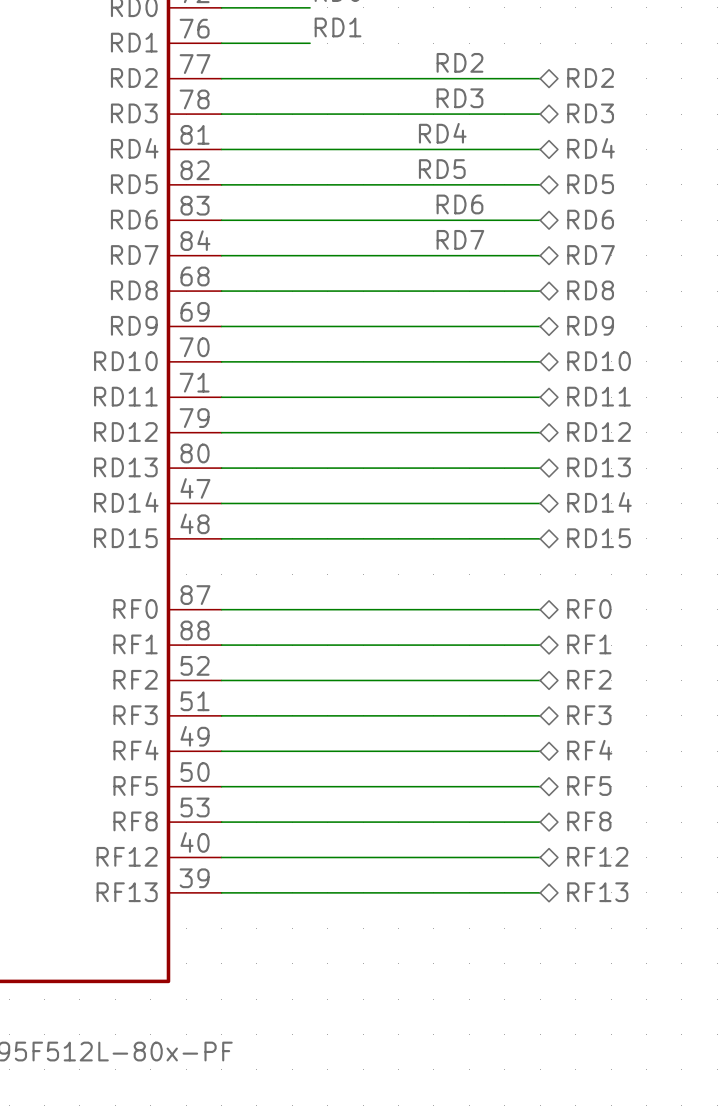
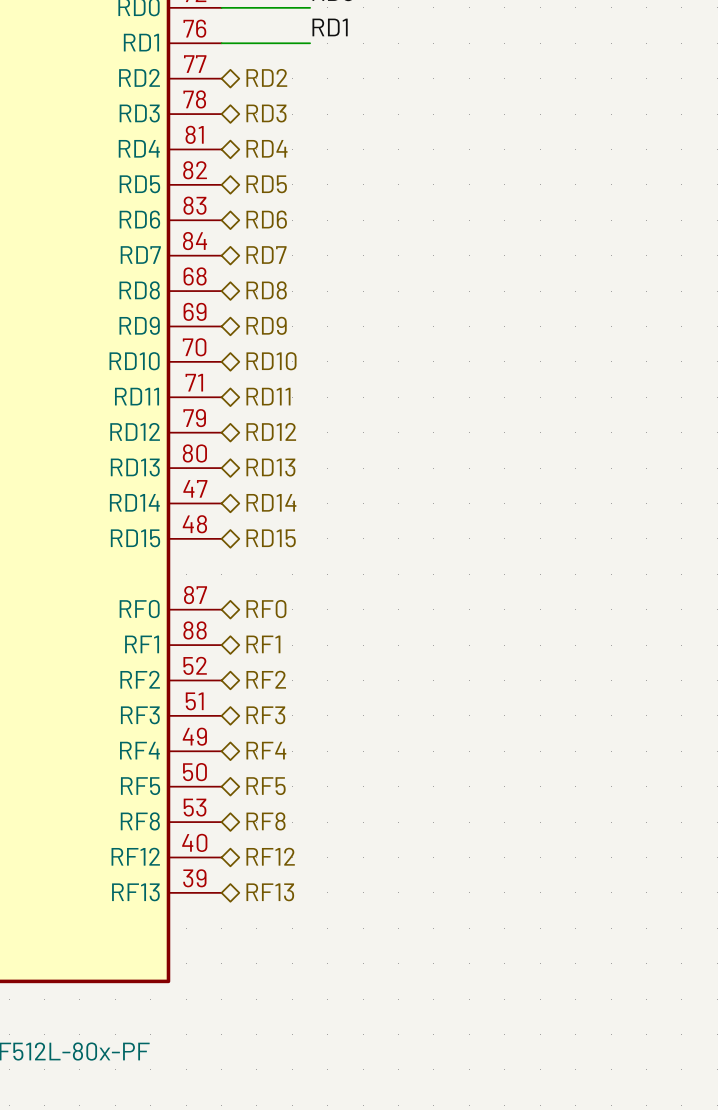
label: RD2 (459, 62) -> none
wire: (221, 78) (540, 78) -> none
hierarchical label position: RD2 (590, 78) -> RD2 (266, 77)
label: RD3 (459, 98) -> none
hierarchical label position: RD3 (590, 113) -> RD3 (266, 113)
wire: (221, 114) (540, 114) -> none
label: RD4 (442, 133) -> none
hierarchical label position: RD4 (591, 148) -> RD4 (267, 148)
wire: (221, 149) (540, 149) -> none
label: RD5 (442, 169) -> none
wire: (221, 184) (540, 184) -> none
hierarchical label position: RD5 (590, 184) -> RD5 (266, 184)
label: RD6 (459, 204) -> none
hierarchical label position: RD6 (590, 219) -> RD6 (266, 219)
wire: (221, 220) (540, 220) -> none
label: RD7 (460, 239) -> none
wire: (221, 255) (540, 255) -> none
hierarchical label position: RD7 (591, 255) -> RD7 (266, 255)
hierarchical label position: RD8 (590, 290) -> RD8 (266, 290)
wire: (221, 291) (540, 291) -> none
hierarchical label position: RD9 (590, 325) -> RD9 (266, 325)
wire: (221, 326) (540, 326) -> none
wire: (221, 361) (540, 361) -> none
hierarchical label position: RD10 (599, 361) -> RD10 (271, 361)
hierarchical label position: RD11 (599, 396) -> RD11 (268, 396)
wire: (221, 397) (540, 397) -> none
wire: (221, 432) (540, 432) -> none
hierarchical label position: RD12 (599, 432) -> RD12 (271, 431)
hierarchical label position: RD13 (599, 467) -> RD13 (270, 467)
wire: (221, 468) (540, 468) -> none
hierarchical label position: RD14 (599, 502) -> RD14 (271, 502)
wire: (221, 503) (540, 503) -> none
wire: (221, 538) (540, 538) -> none
hierarchical label position: RD15 (599, 538) -> RD15 (271, 538)
wire: (221, 609) (540, 609) -> none
hierarchical label position: RF0 (589, 609) -> RF0 (266, 609)
hierarchical label position: RF1 (589, 644) -> RF1 (263, 644)
wire: (221, 645) (540, 645) -> none
hierarchical label position: RF2 (589, 679) -> RF2 (266, 679)
wire: (221, 680) (540, 680) -> none
wire: (221, 715) (540, 715) -> none
hierarchical label position: RF3 (589, 715) -> RF3 (265, 715)
hierarchical label position: RF4 (589, 750) -> RF4 (266, 750)
wire: (221, 751) (540, 751) -> none
wire: (221, 786) (540, 786) -> none
hierarchical label position: RF5 (589, 786) -> RF5 (266, 786)
hierarchical label position: RF8 (589, 821) -> RF8 (265, 821)
wire: (221, 822) (540, 822) -> none
hierarchical label position: RF12 (597, 856) -> RF12 (270, 856)
wire: (221, 857) (540, 857) -> none
wire: (221, 892) (540, 892) -> none
hierarchical label position: RF13 (597, 892) -> RF13 (270, 892)

